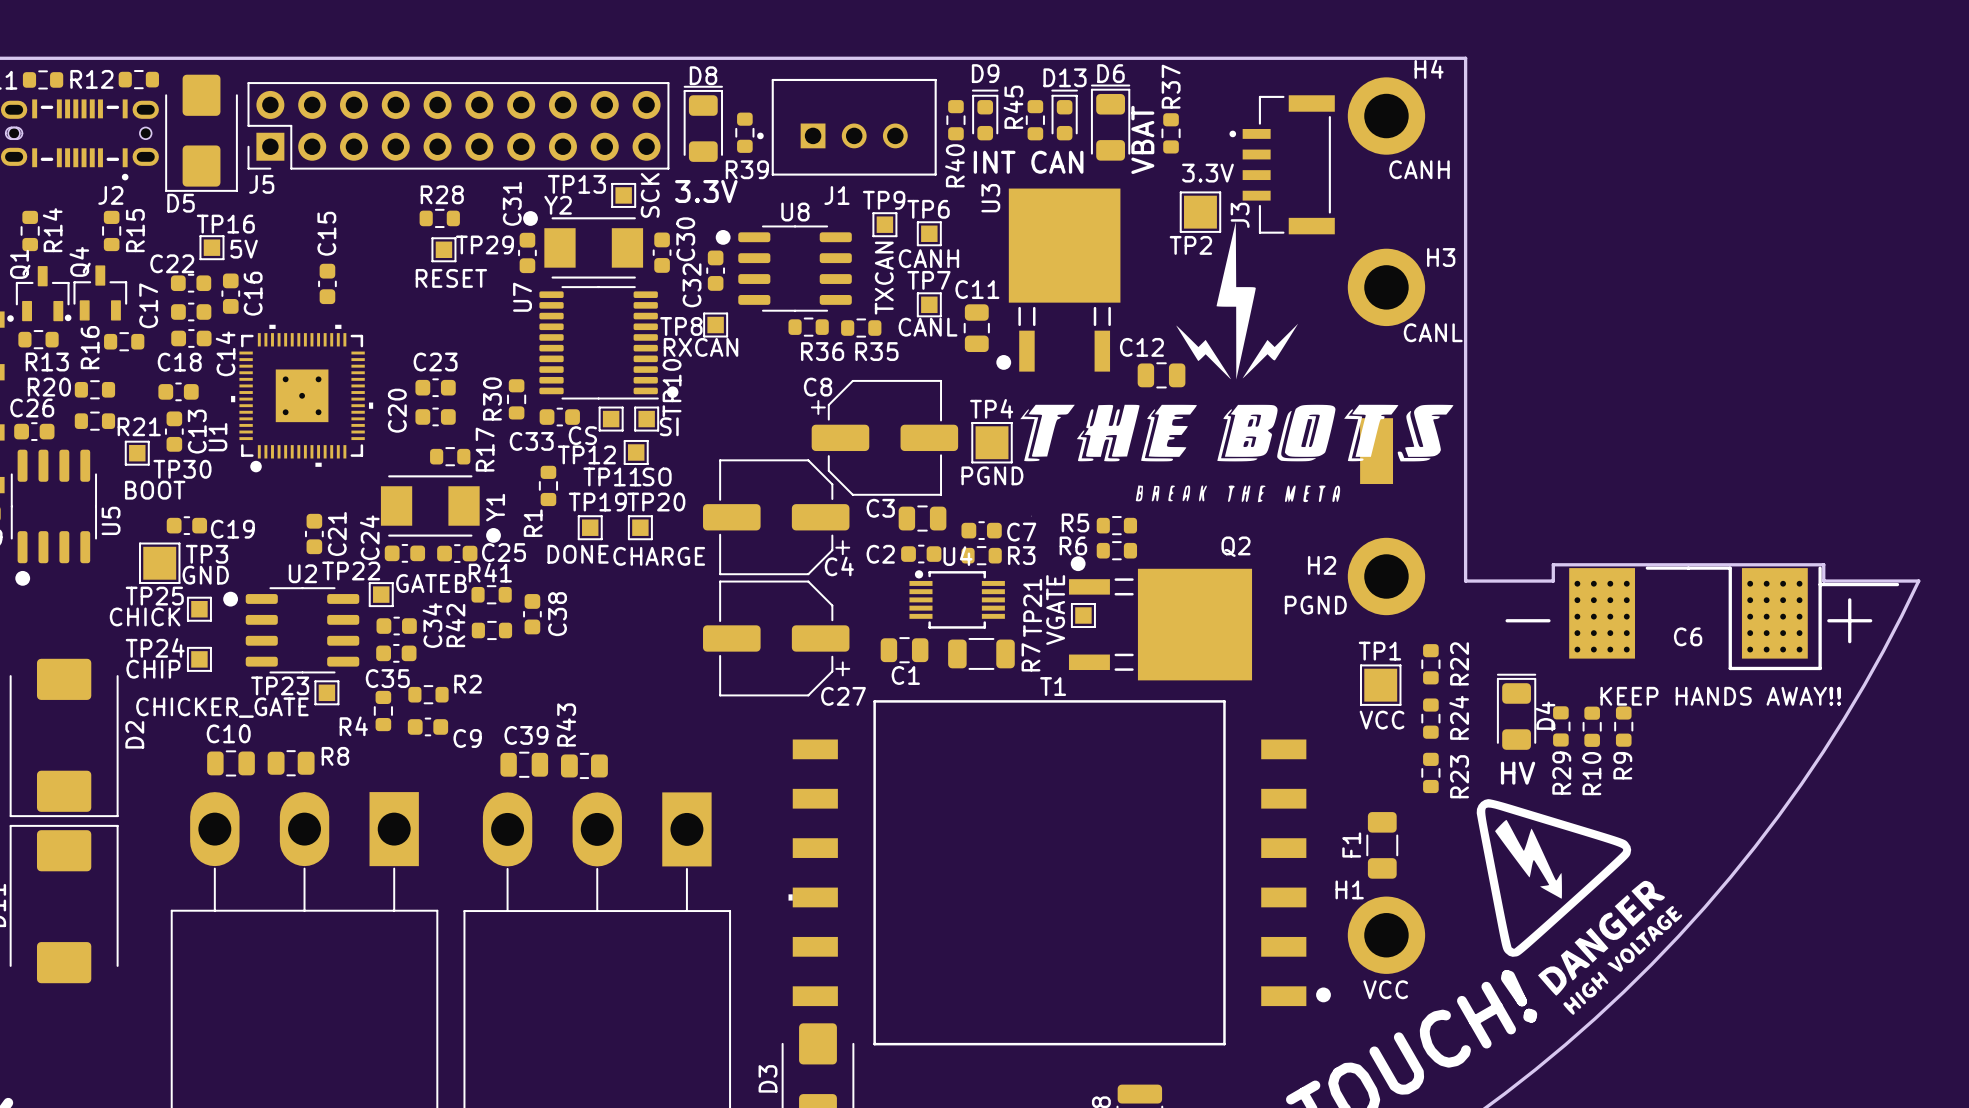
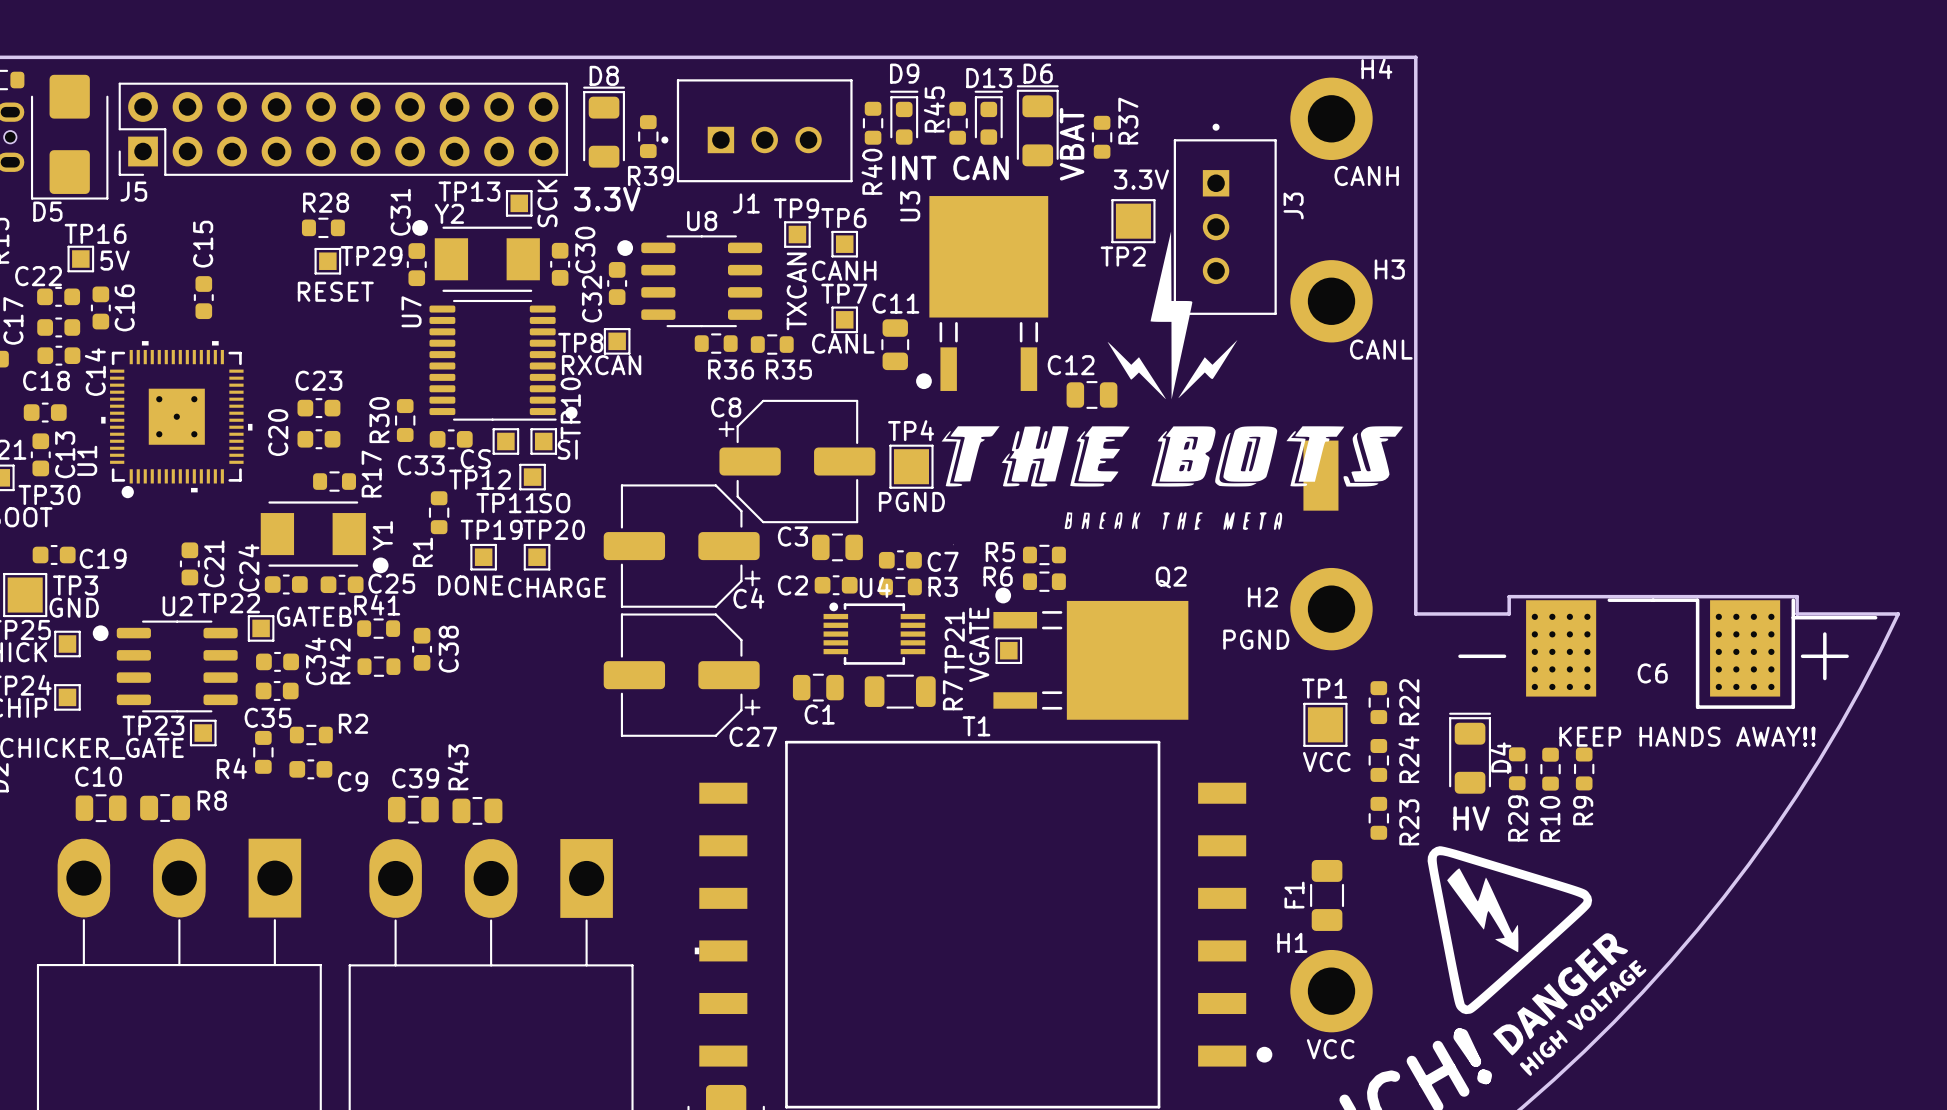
R37 name position: R37 (1171, 86) -> R37 (1128, 121)
J3 footprint: [1229, 95, 1335, 235] -> [1173, 123, 1277, 315]
J3 name position: J3 (1240, 215) -> J3 (1293, 205)

